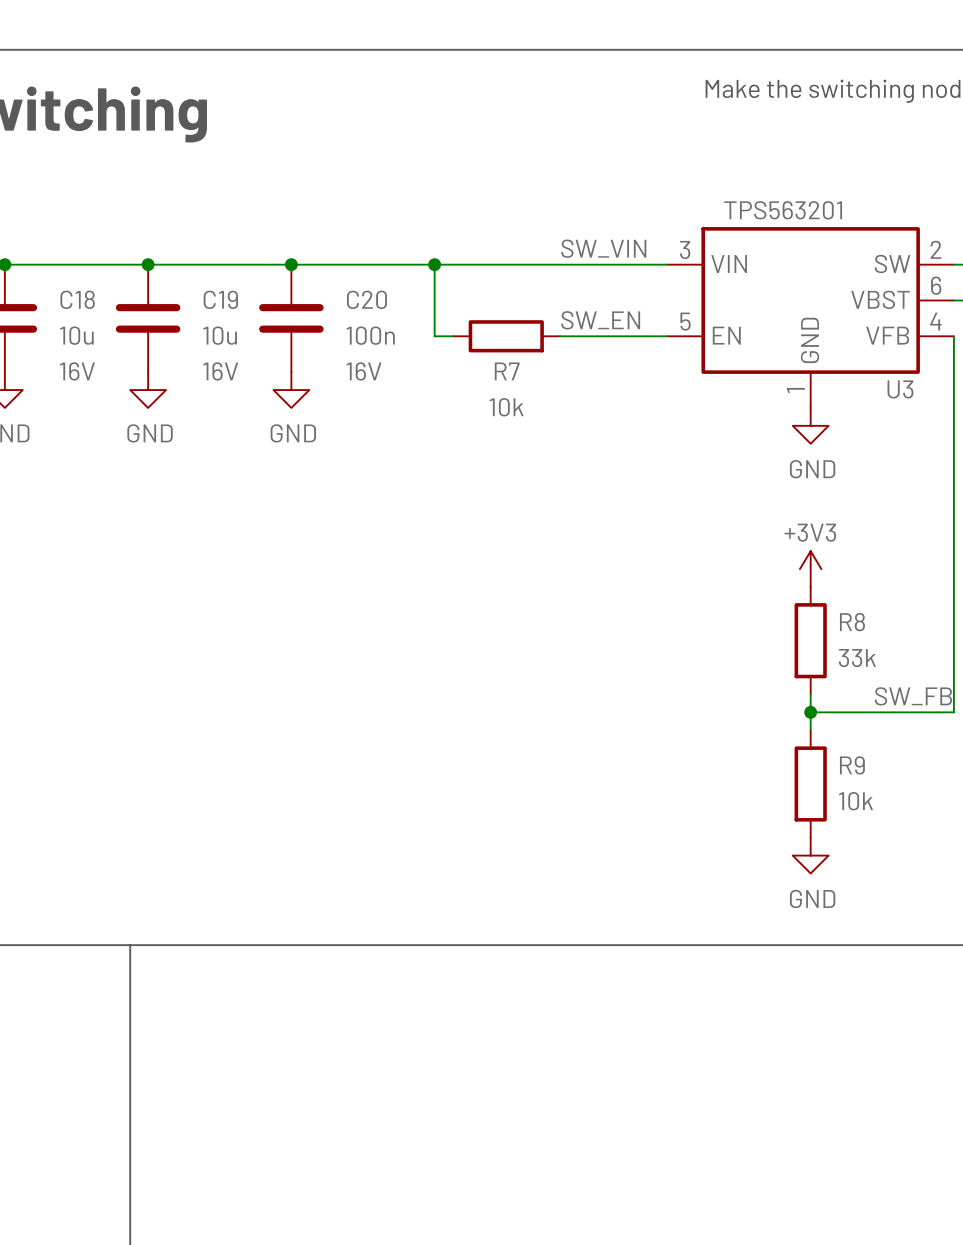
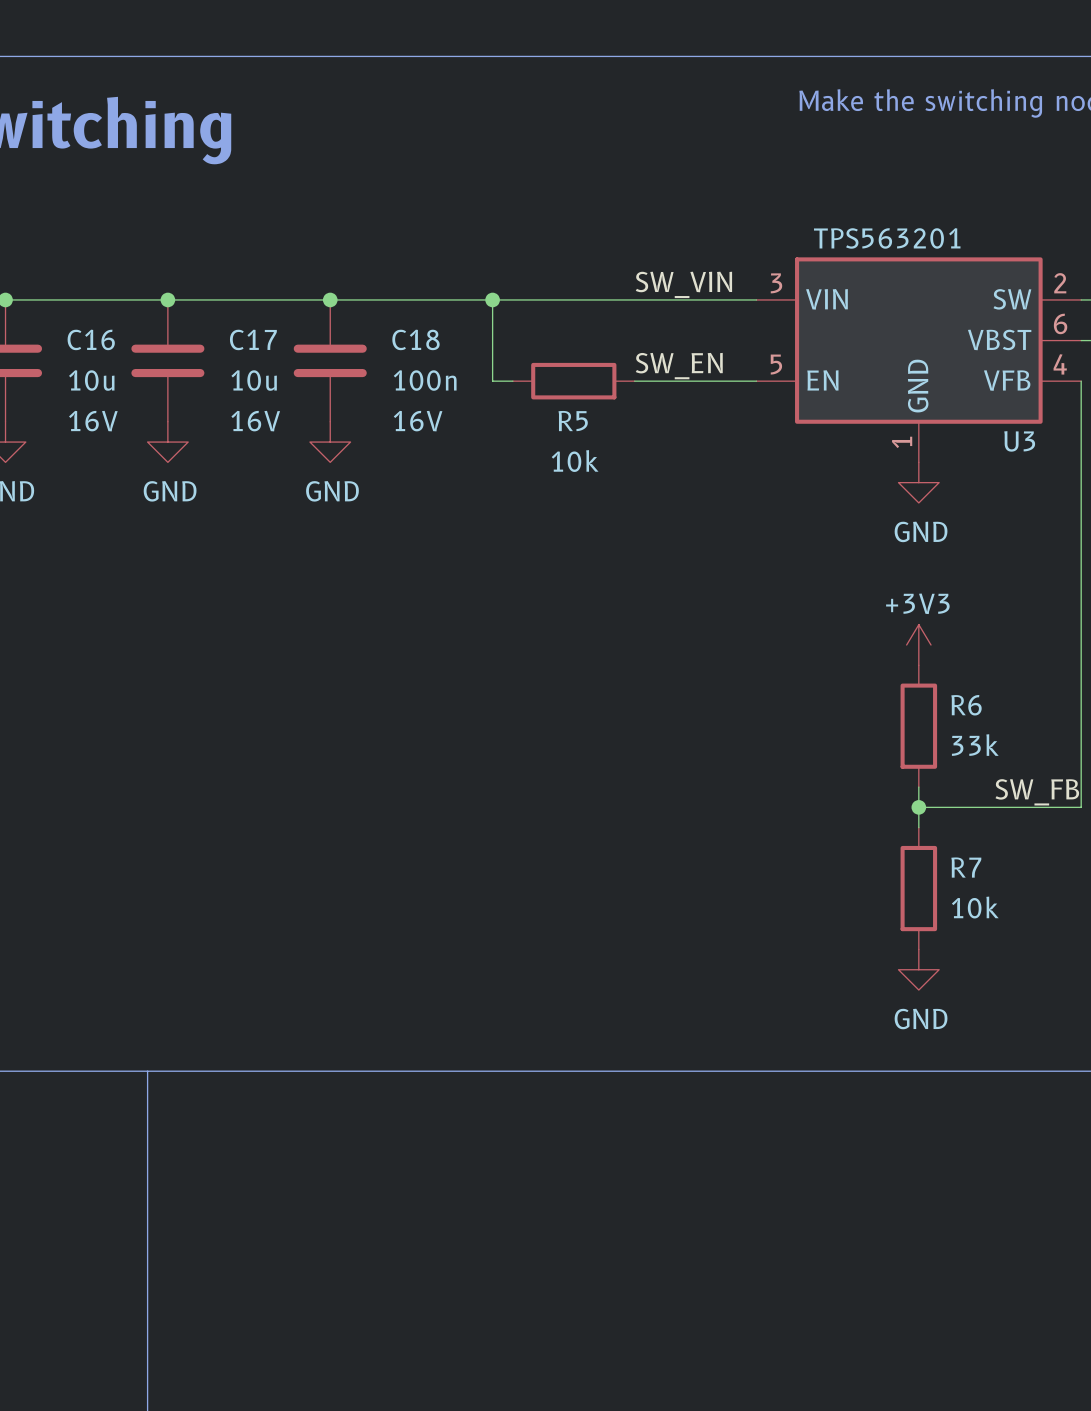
C18 name: C18 (77, 299) -> C16 (91, 339)
C19 name: C19 (220, 299) -> C17 (253, 339)
C20 name: C20 (366, 299) -> C18 (415, 339)
R7 name: R7 (507, 371) -> R5 (573, 421)
R8 name: R8 (852, 622) -> R6 (966, 705)
R9 name: R9 (852, 765) -> R7 (966, 867)

